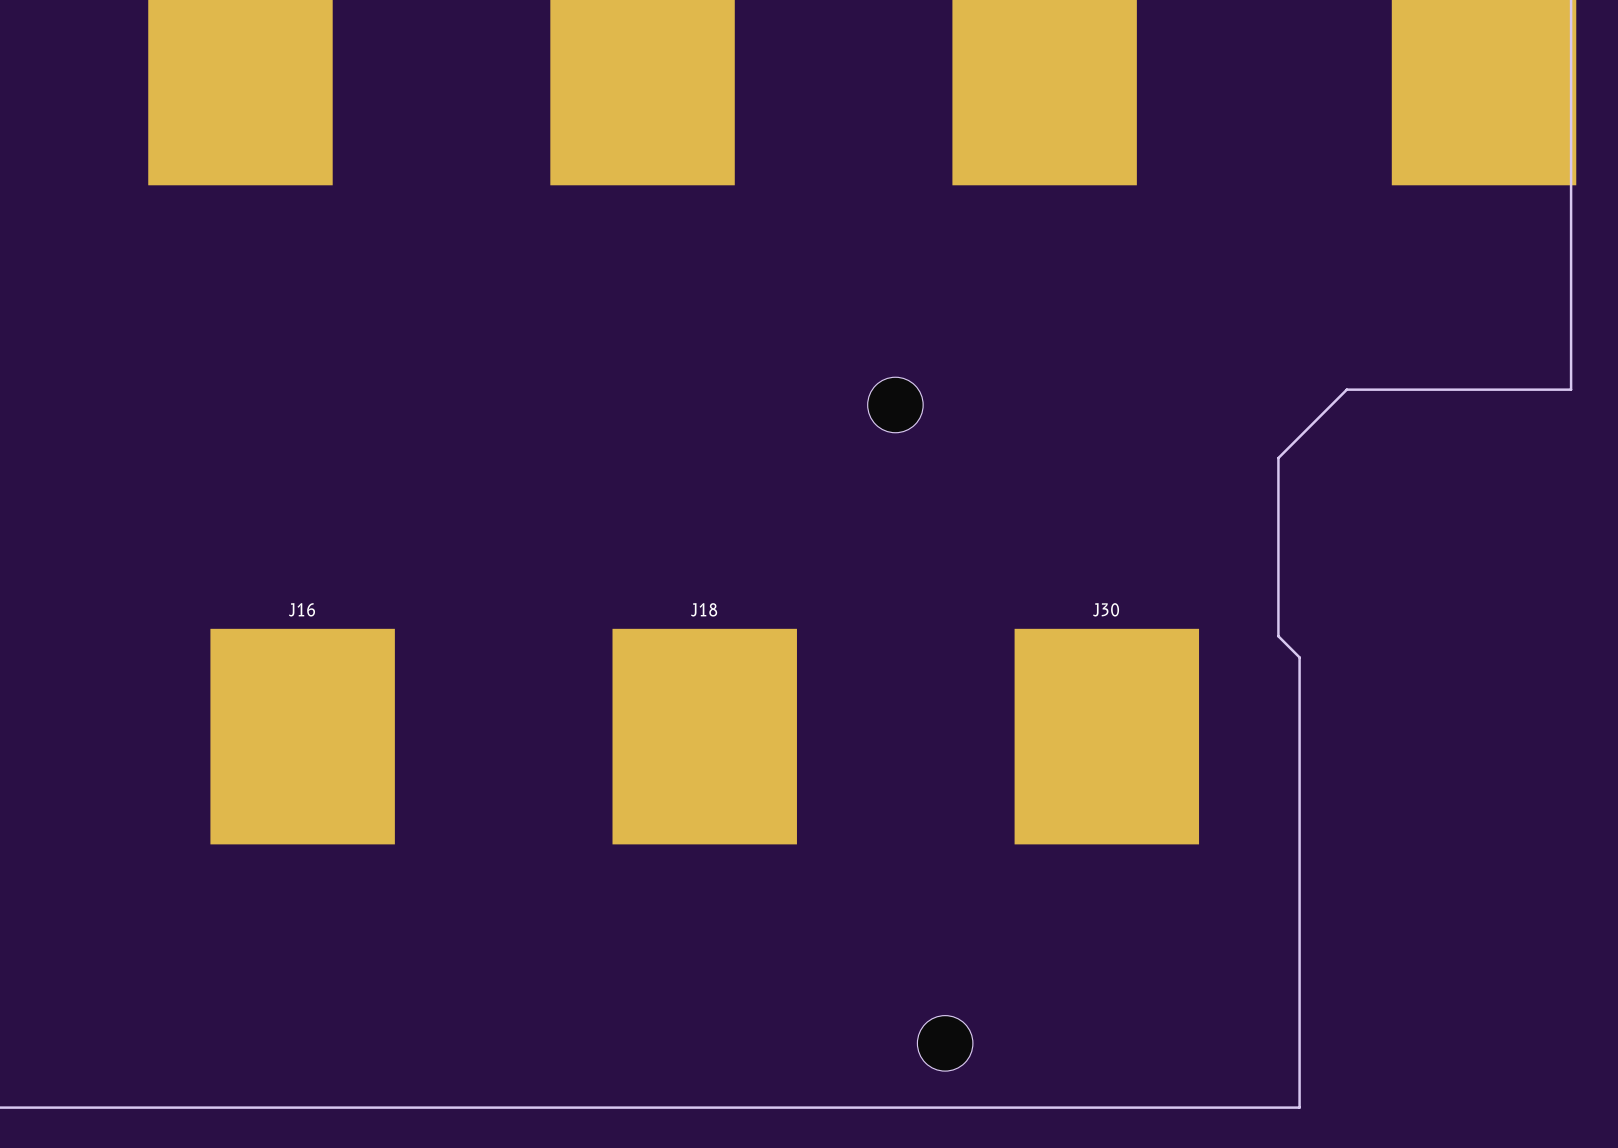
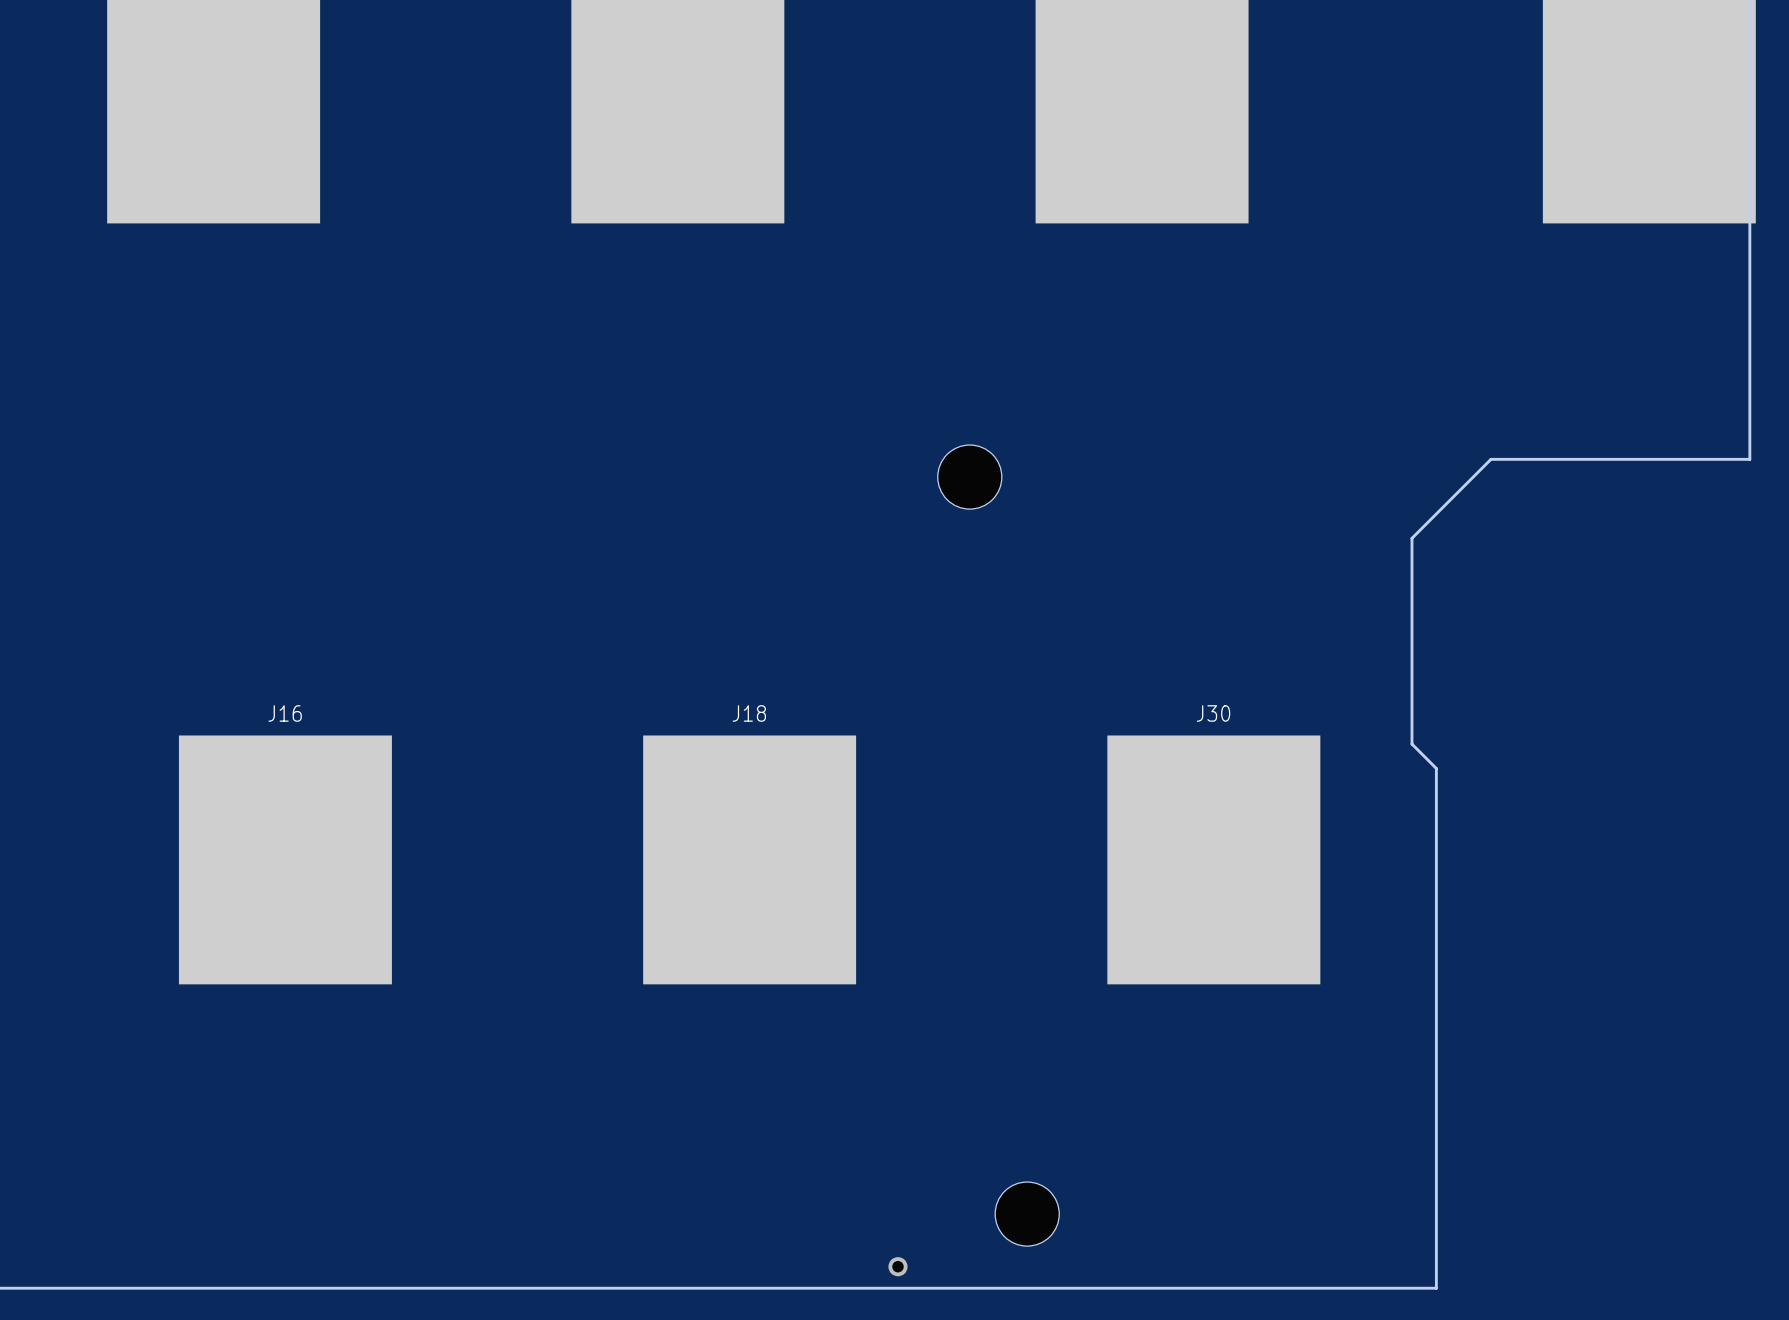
via: none -> (897, 1266)

